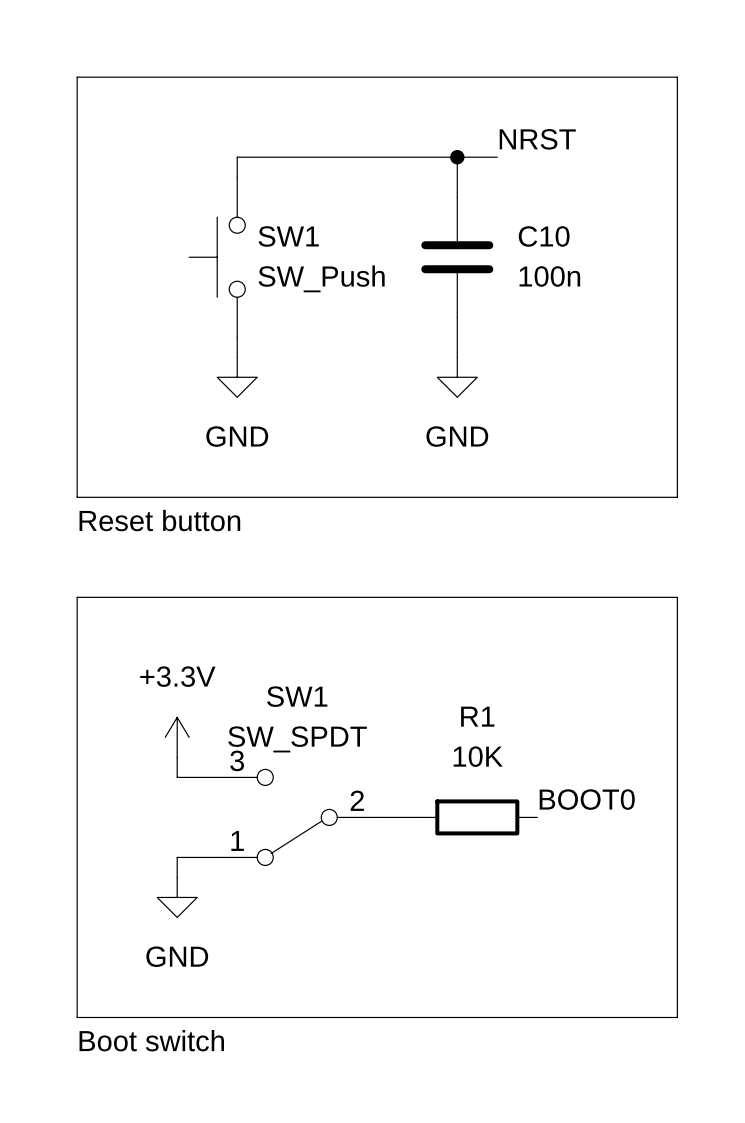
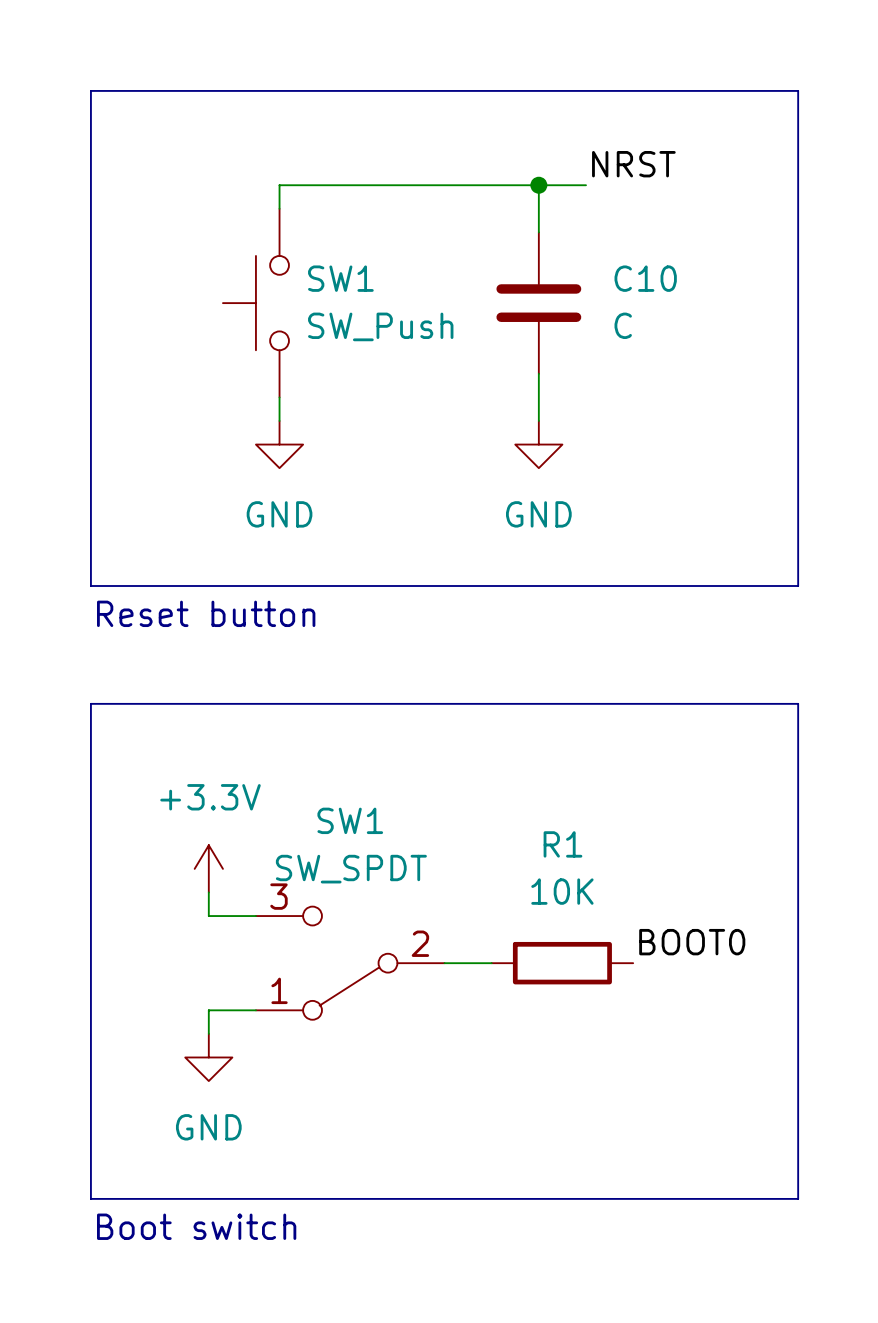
C10 value: 100n (549, 276) -> C (623, 325)

